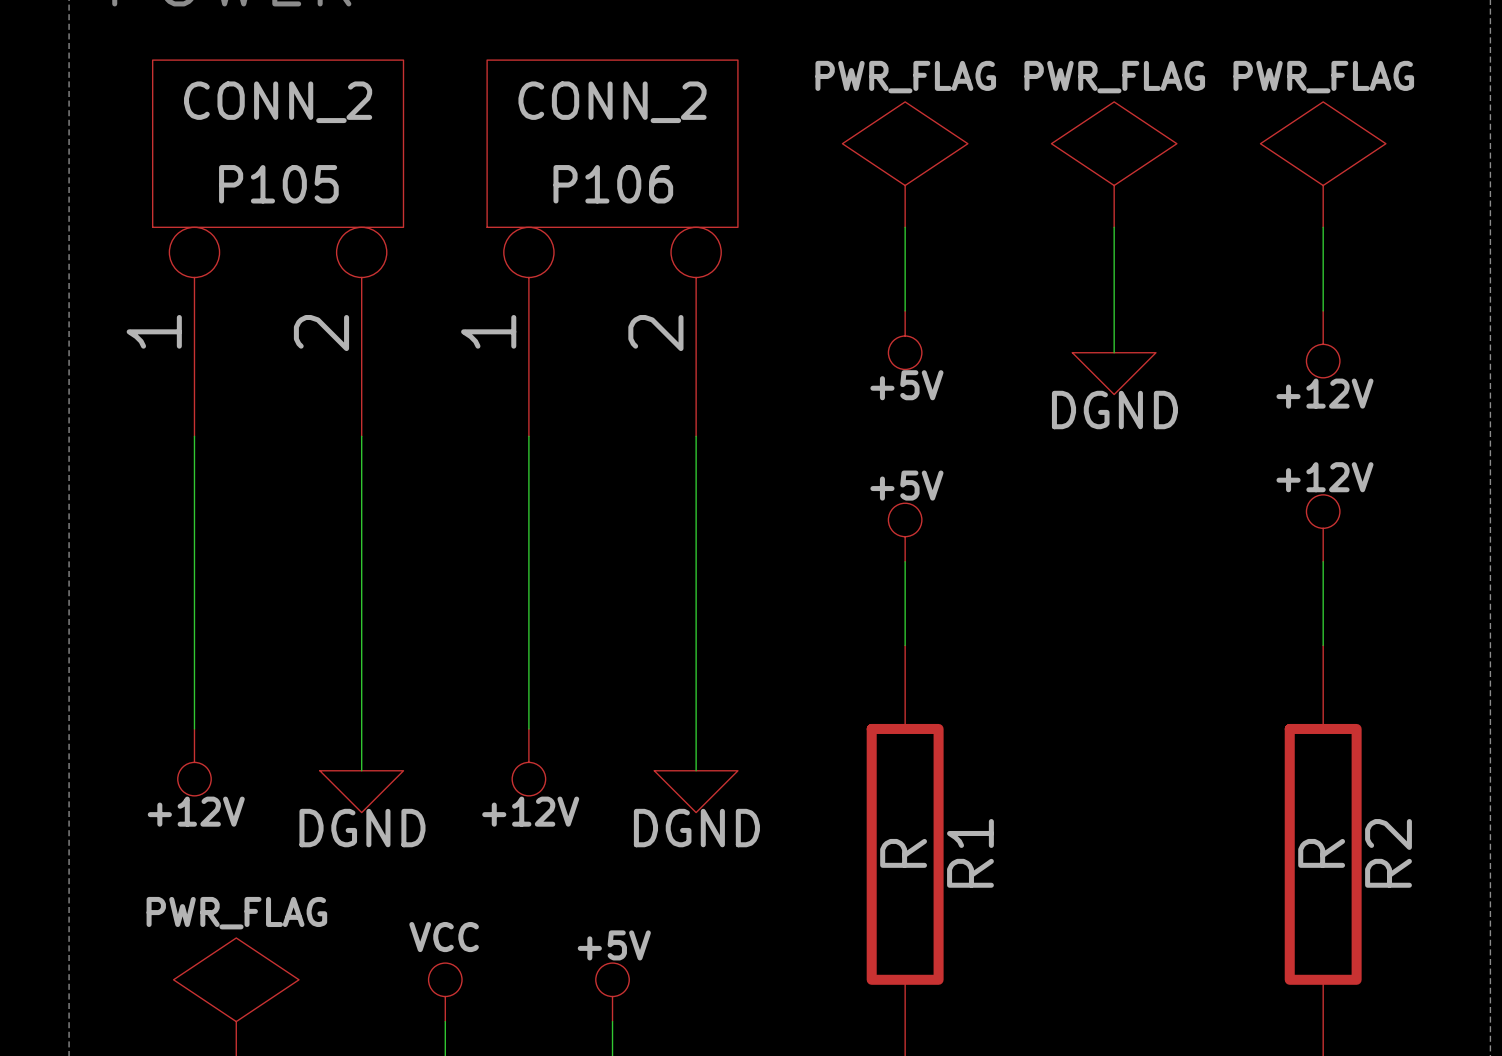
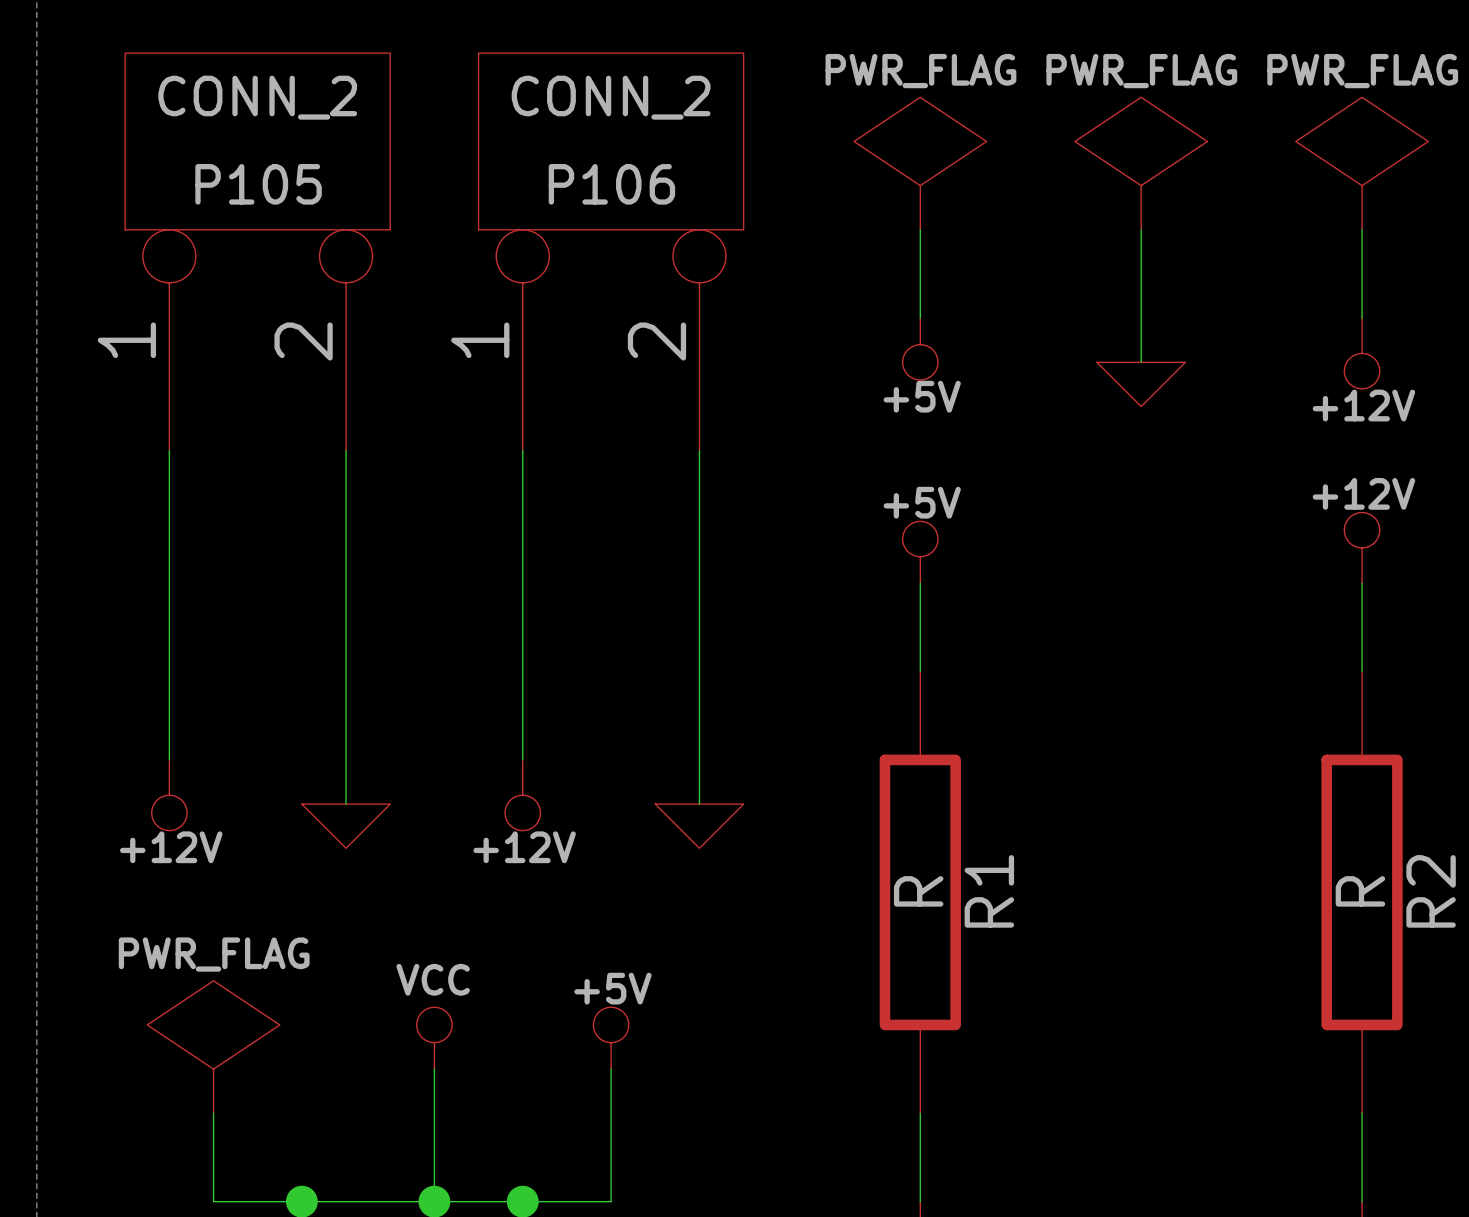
power symbol text: DGND (1114, 410) -> none
power symbol text: DGND (362, 828) -> none
power symbol text: DGND (696, 828) -> none

